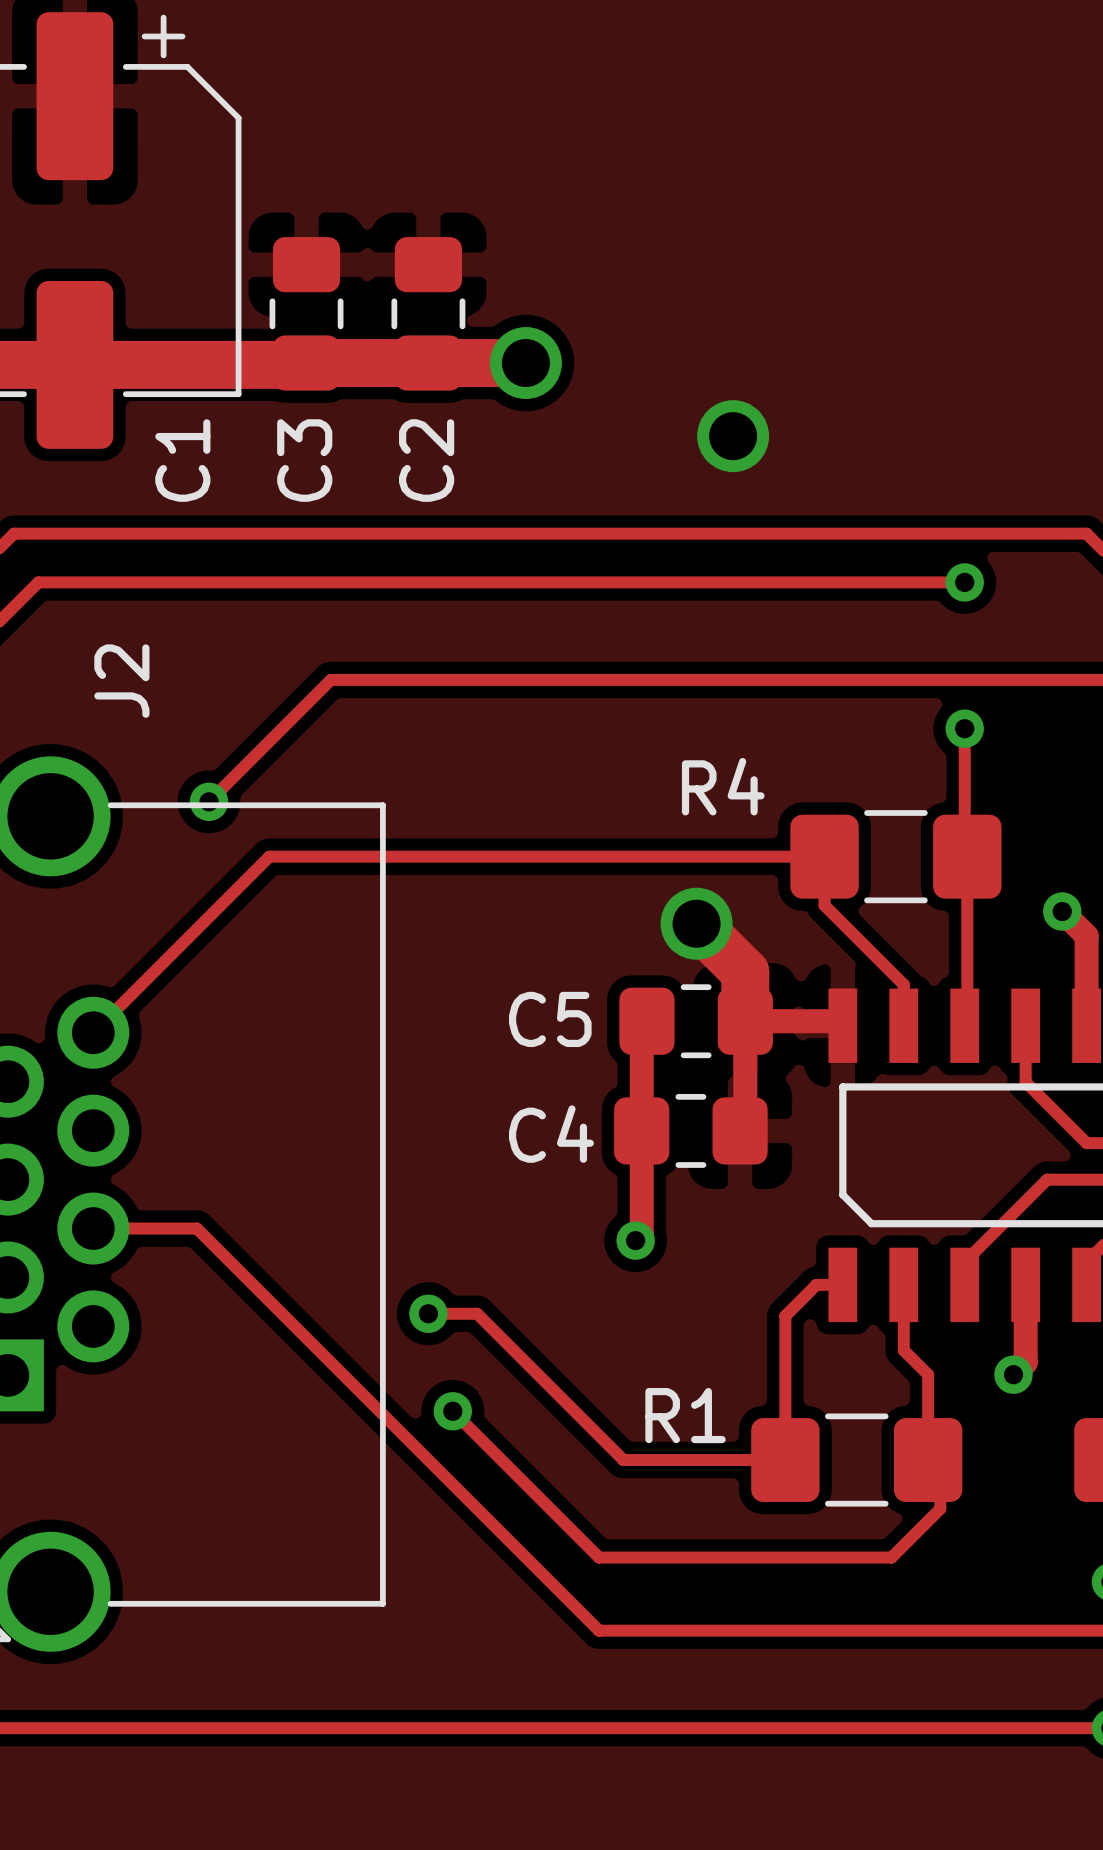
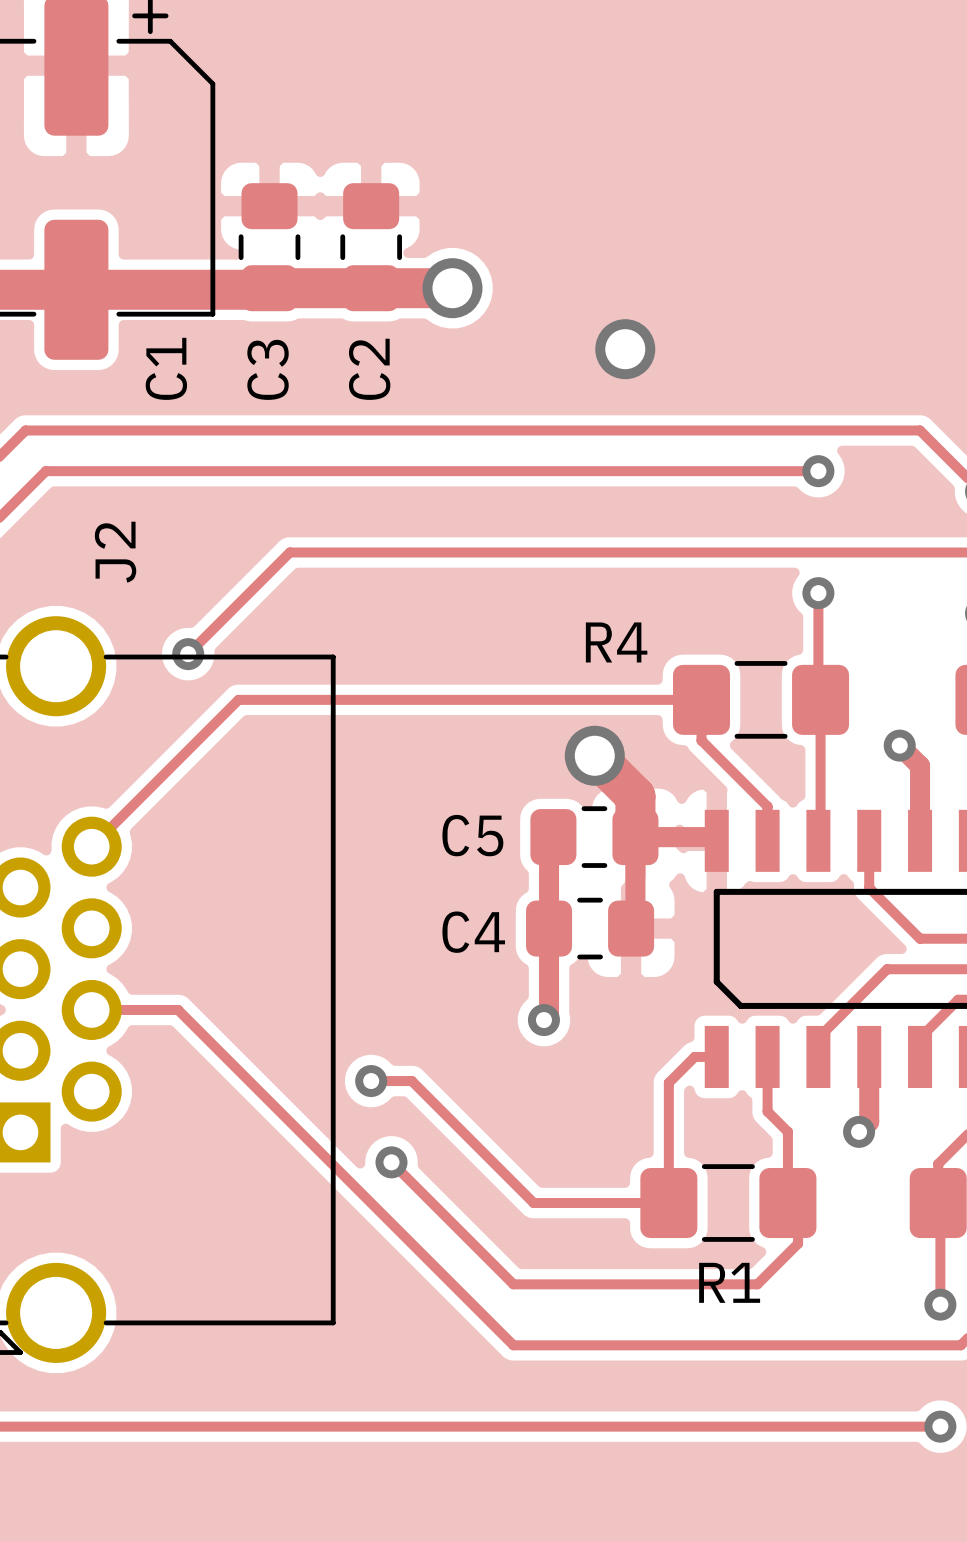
R1 name position: R1 (685, 1415) -> R1 (729, 1282)

